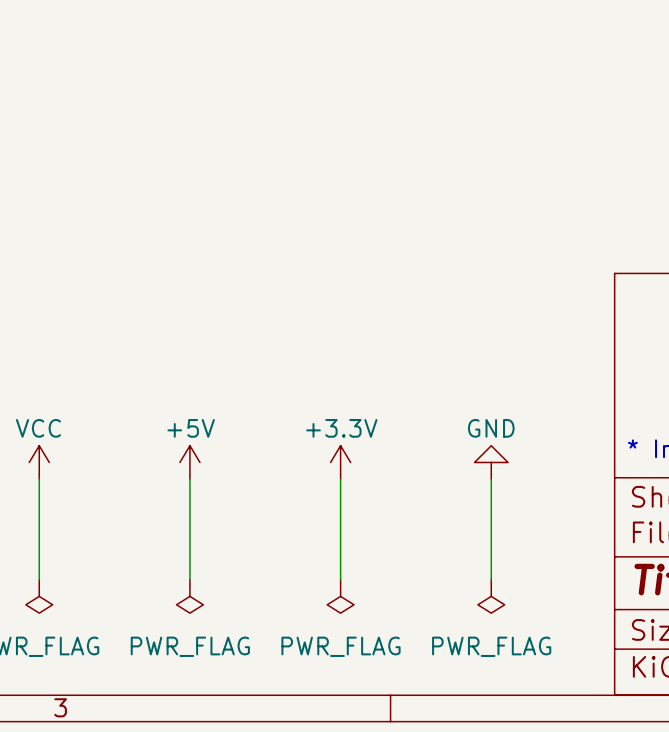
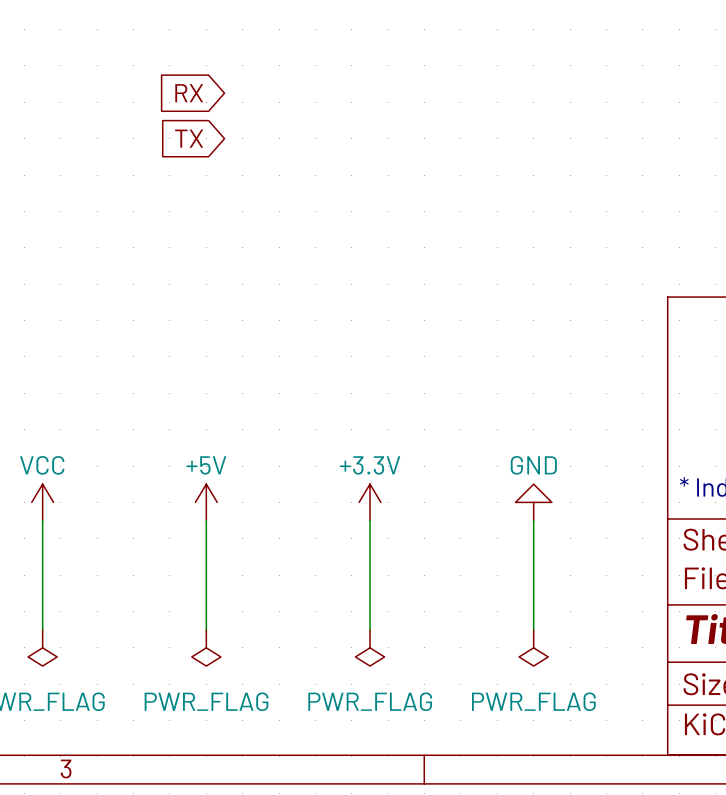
global label: none -> RX (189, 93)
global label: none -> TX (189, 138)

